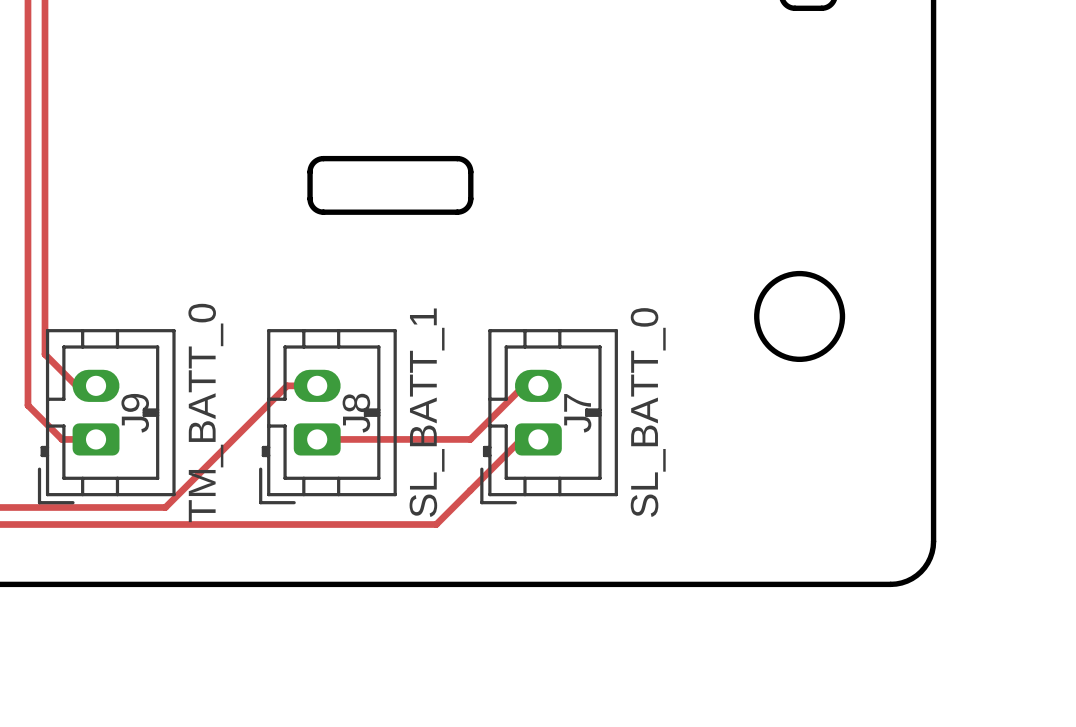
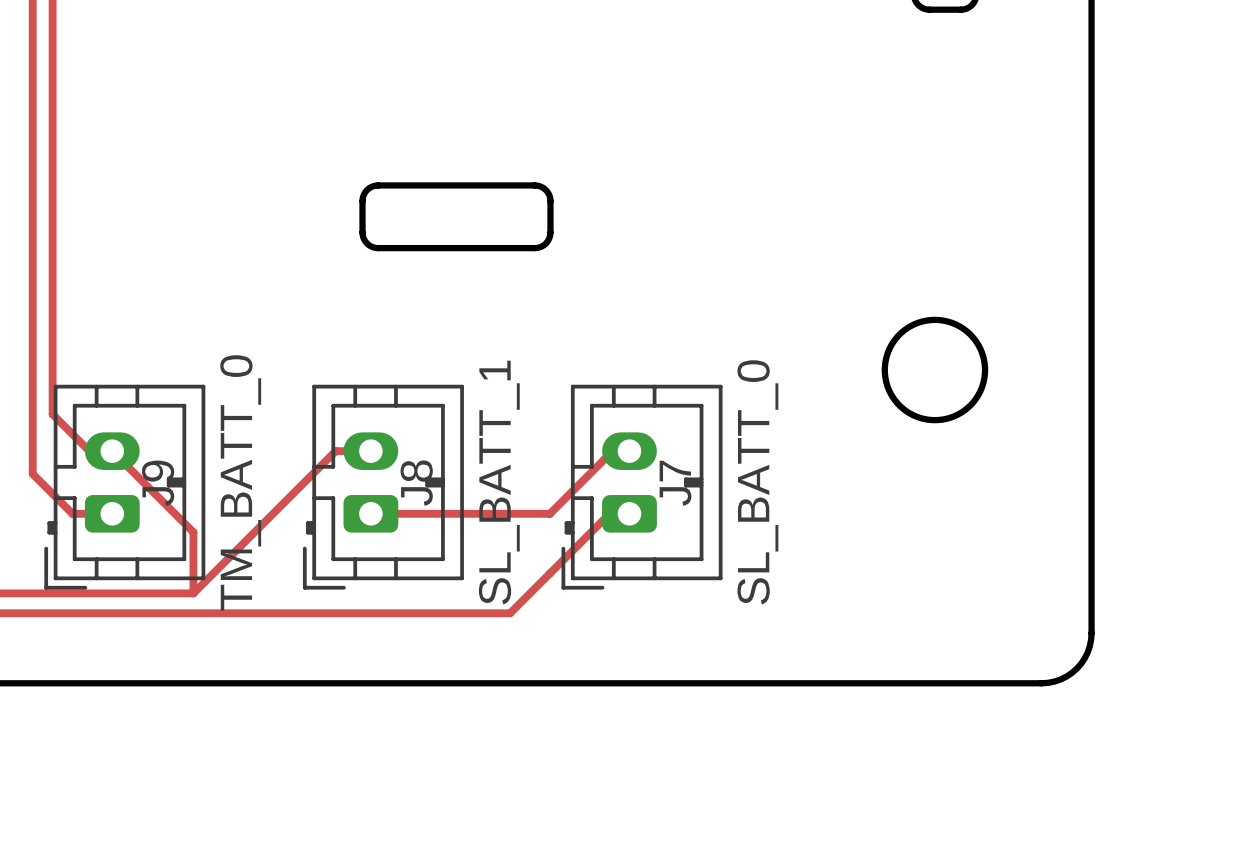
track: none -> (112, 451) (193, 532) (193, 593)

